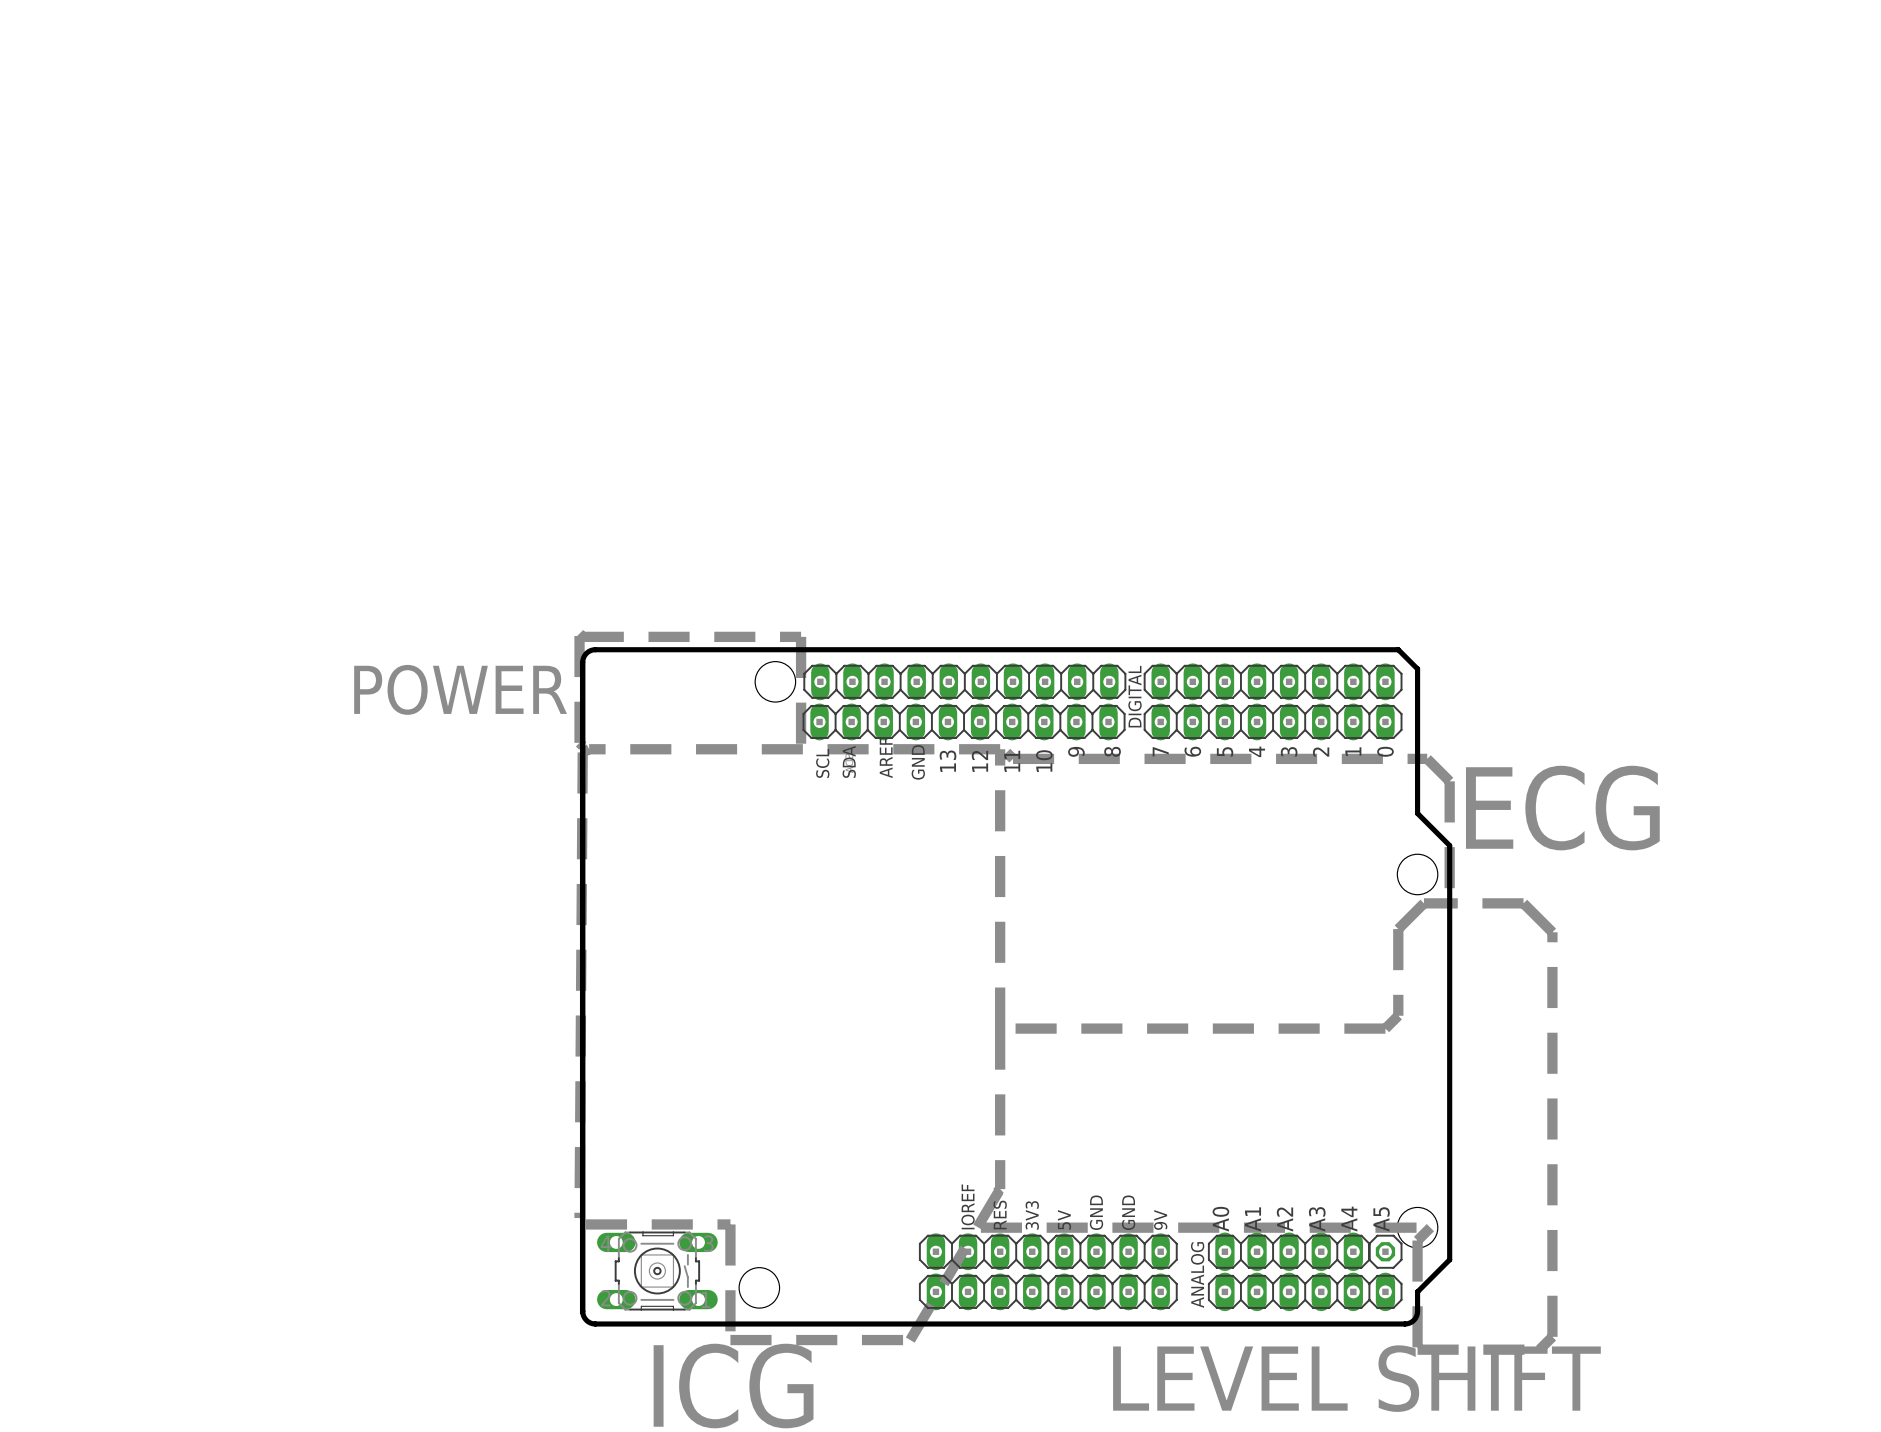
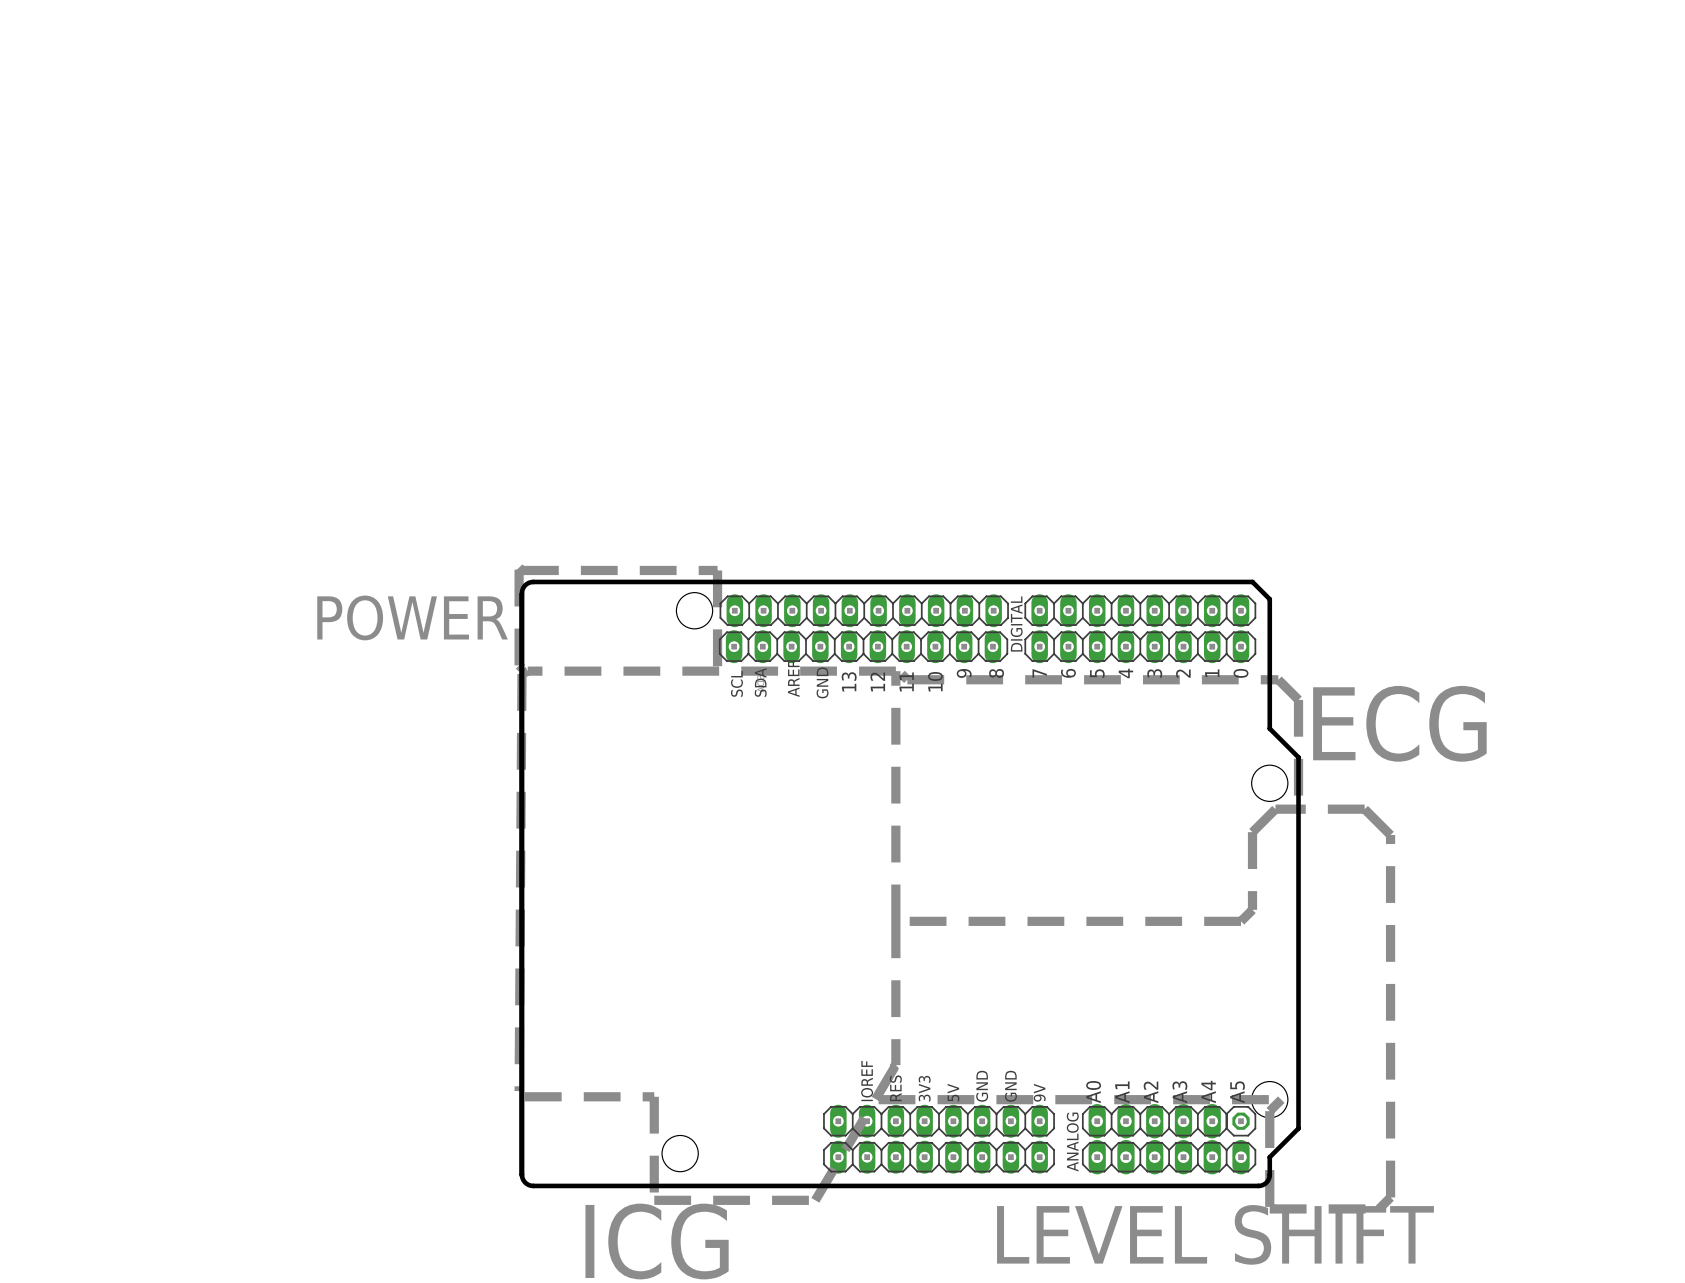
part: (657, 1271) -> none

